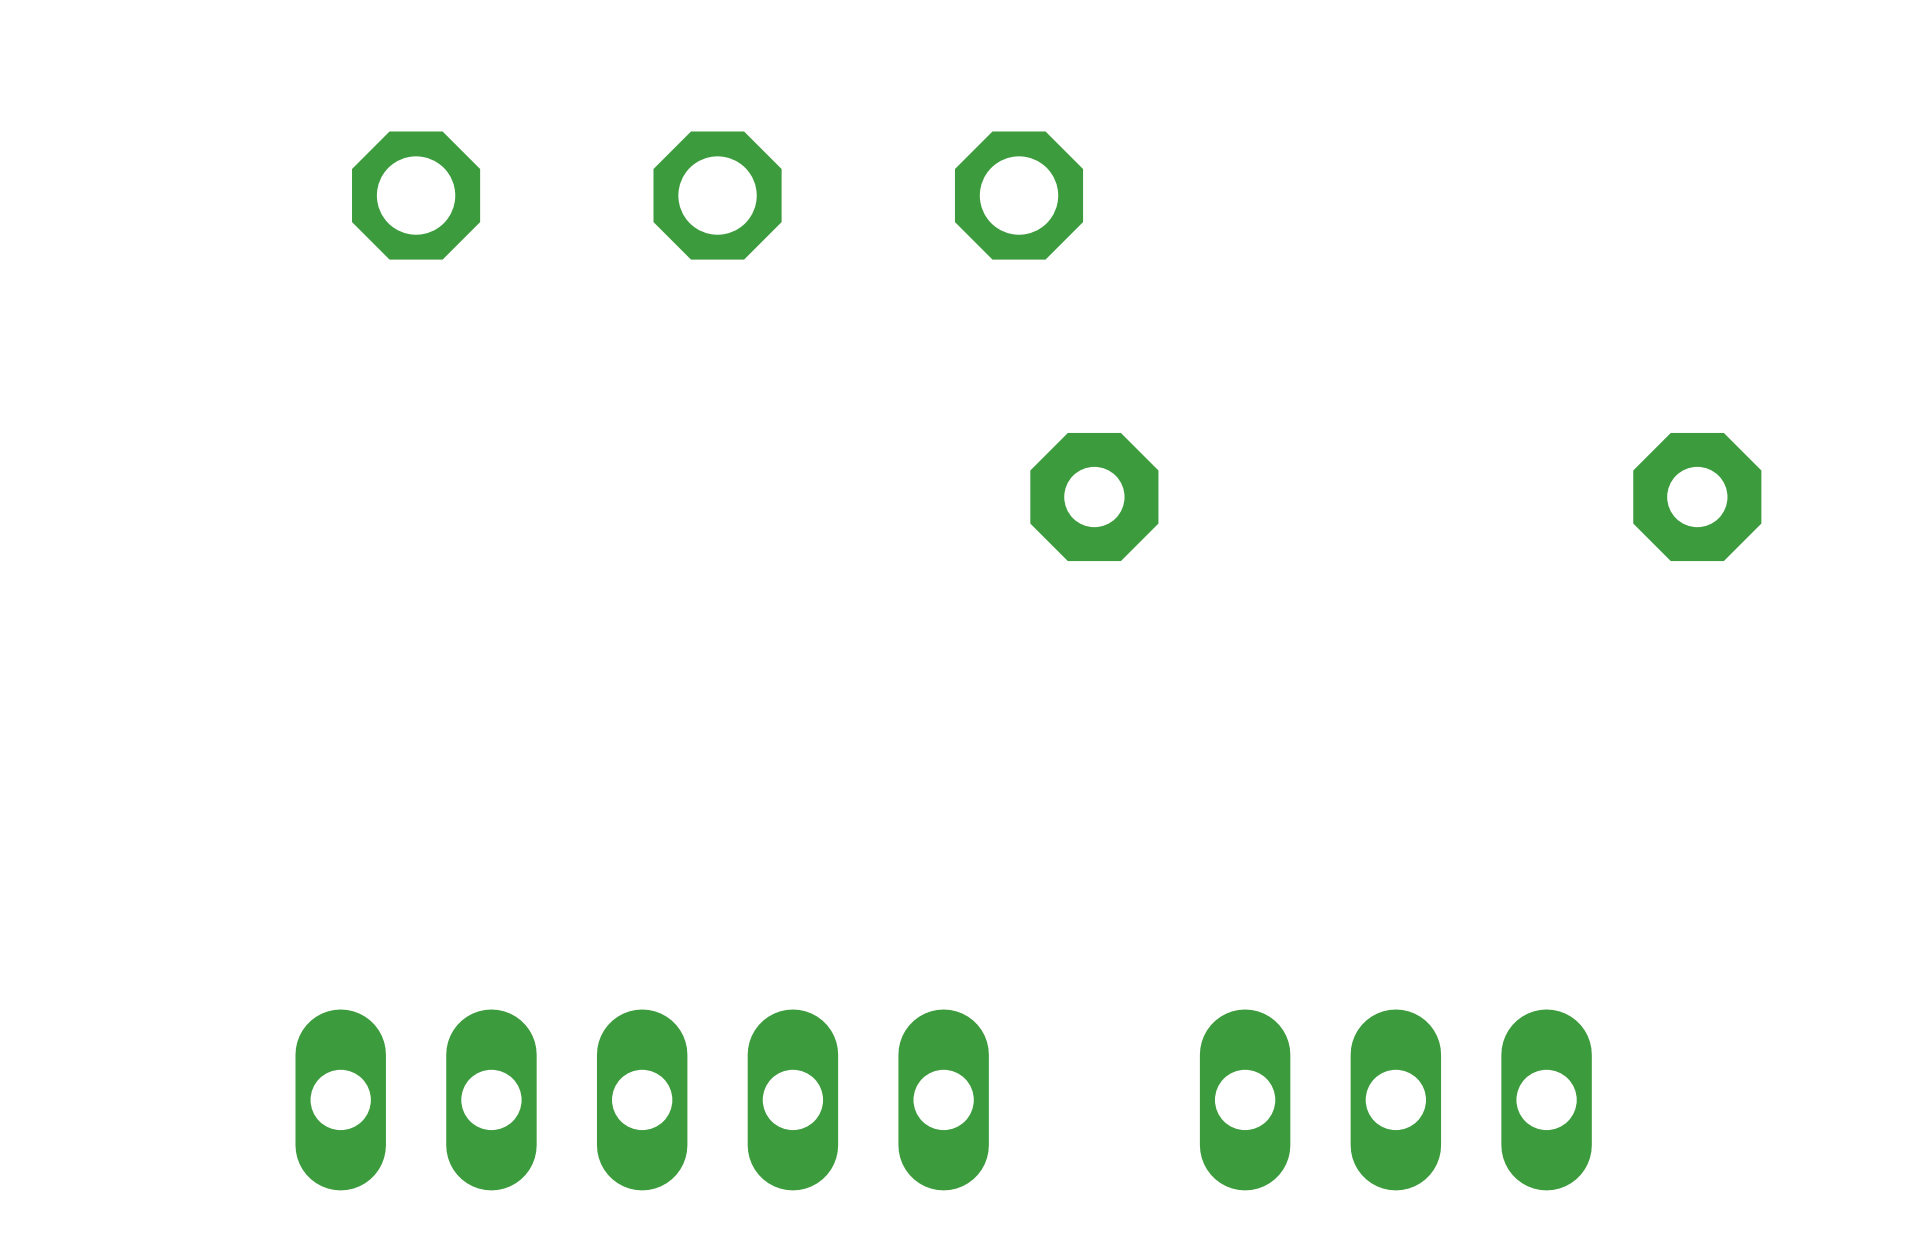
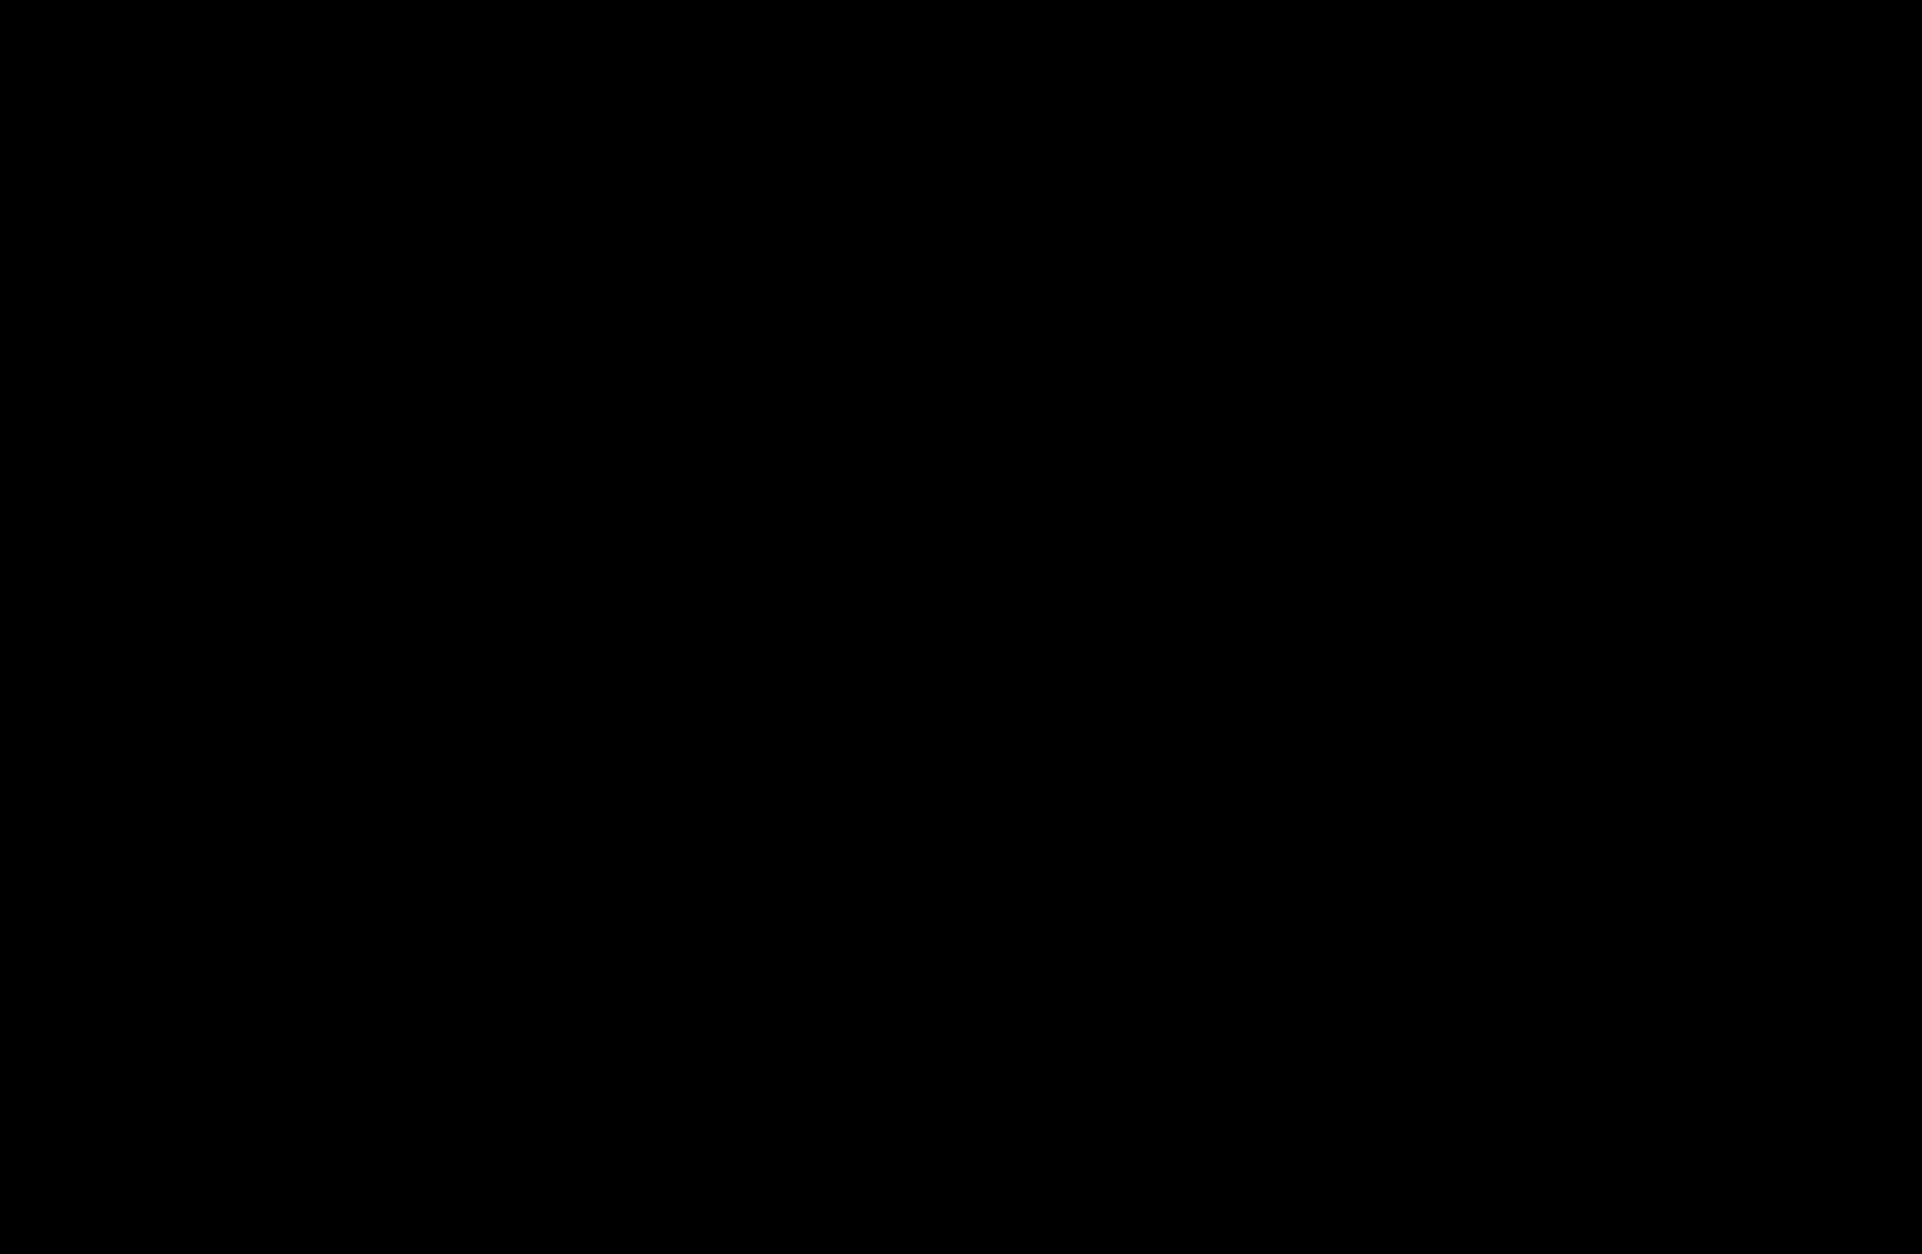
part: (416, 195) -> none
part: (717, 195) -> none
part: (1019, 195) -> none
part: (1094, 497) -> none
part: (1697, 497) -> none
part: (642, 1099) -> none
part: (1395, 1099) -> none

